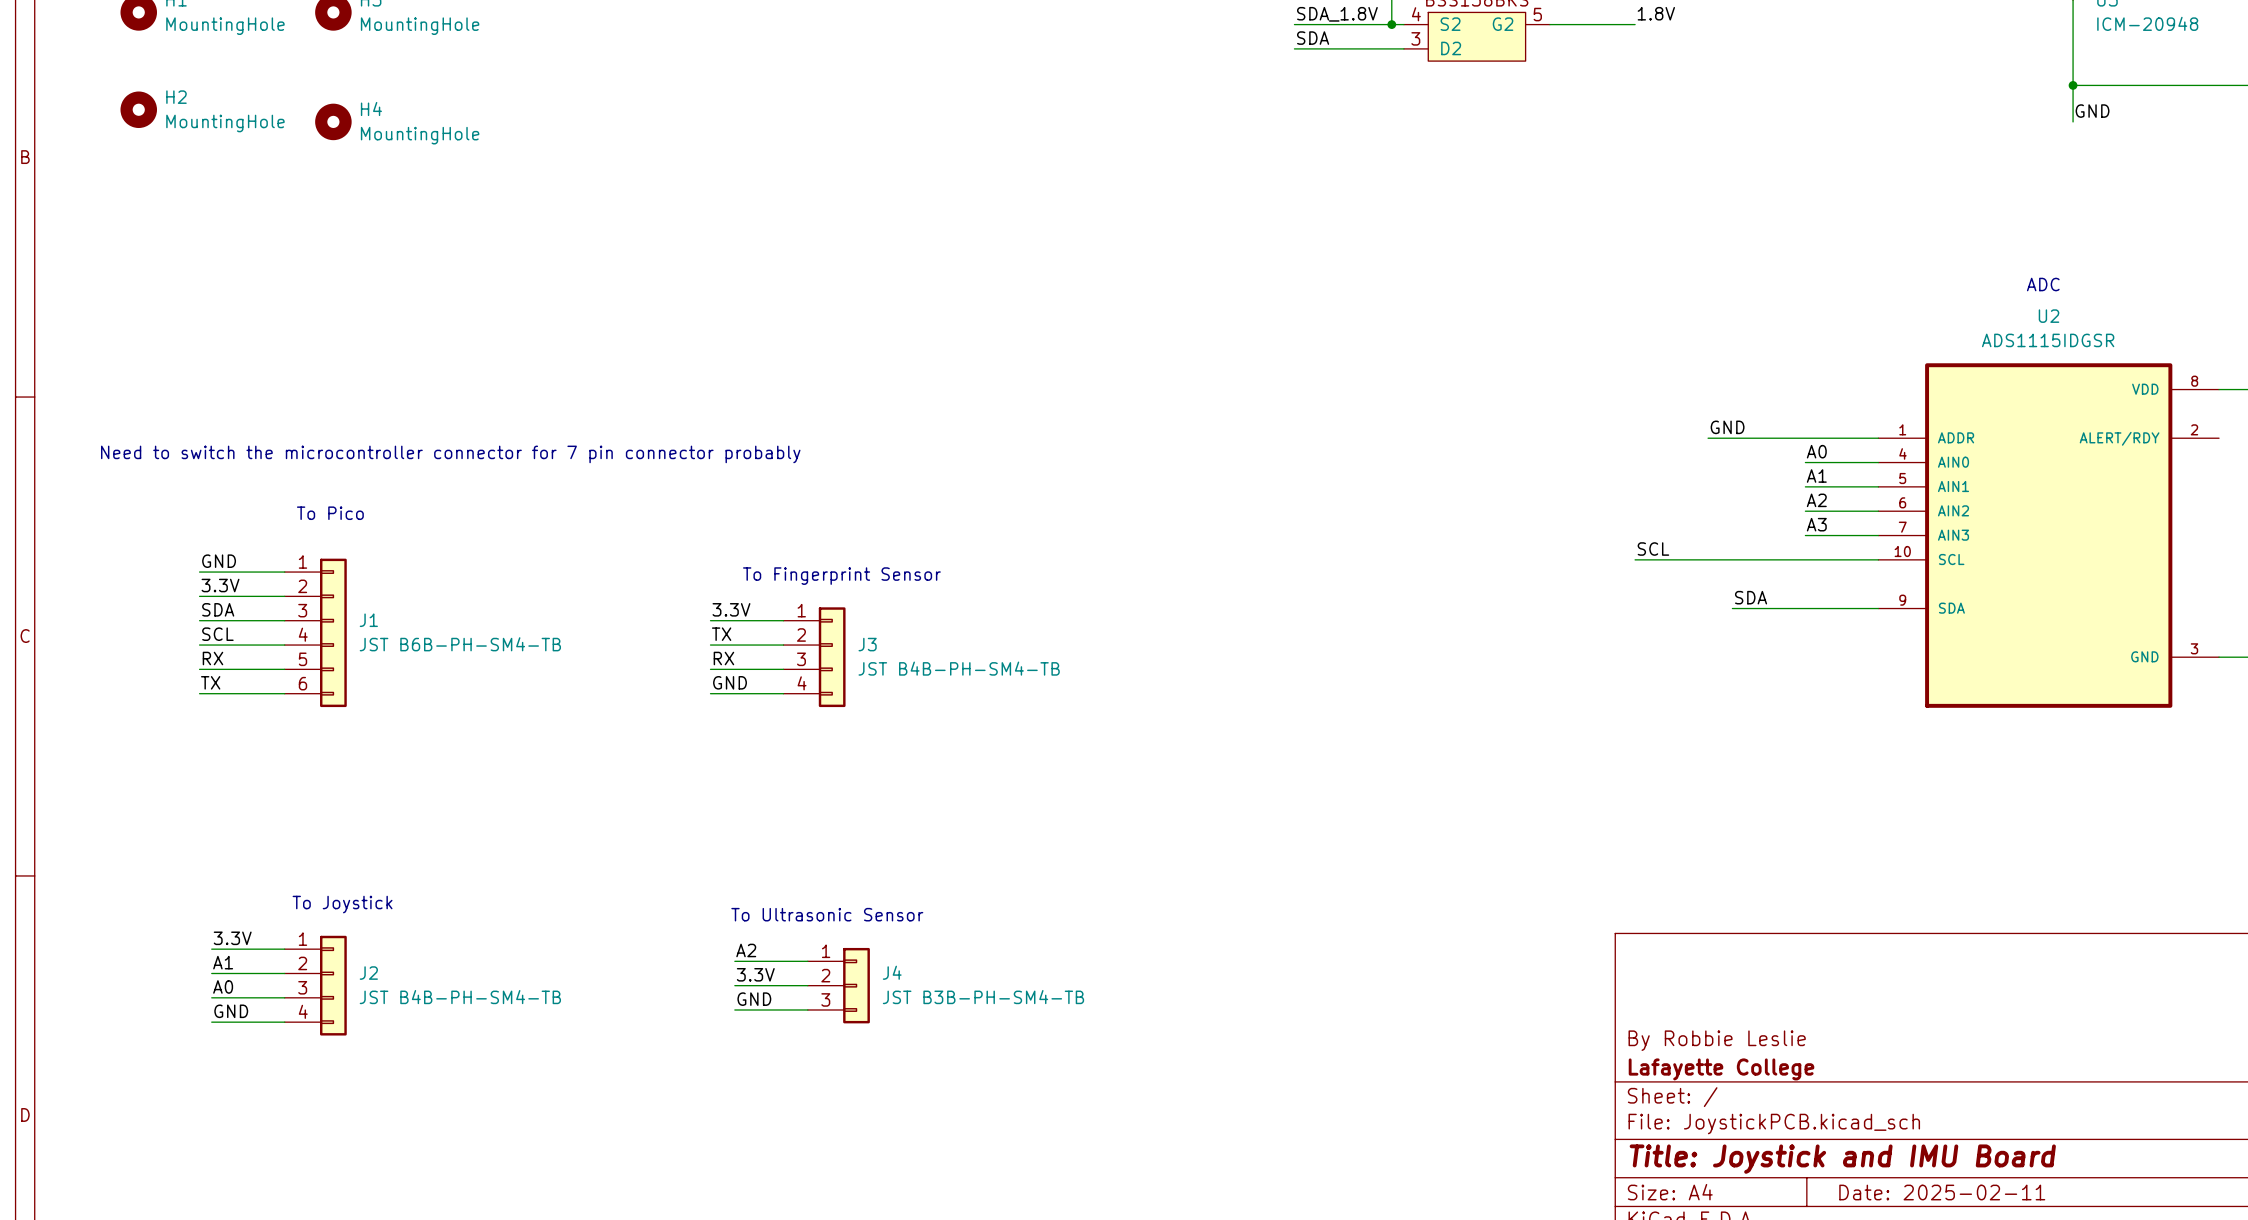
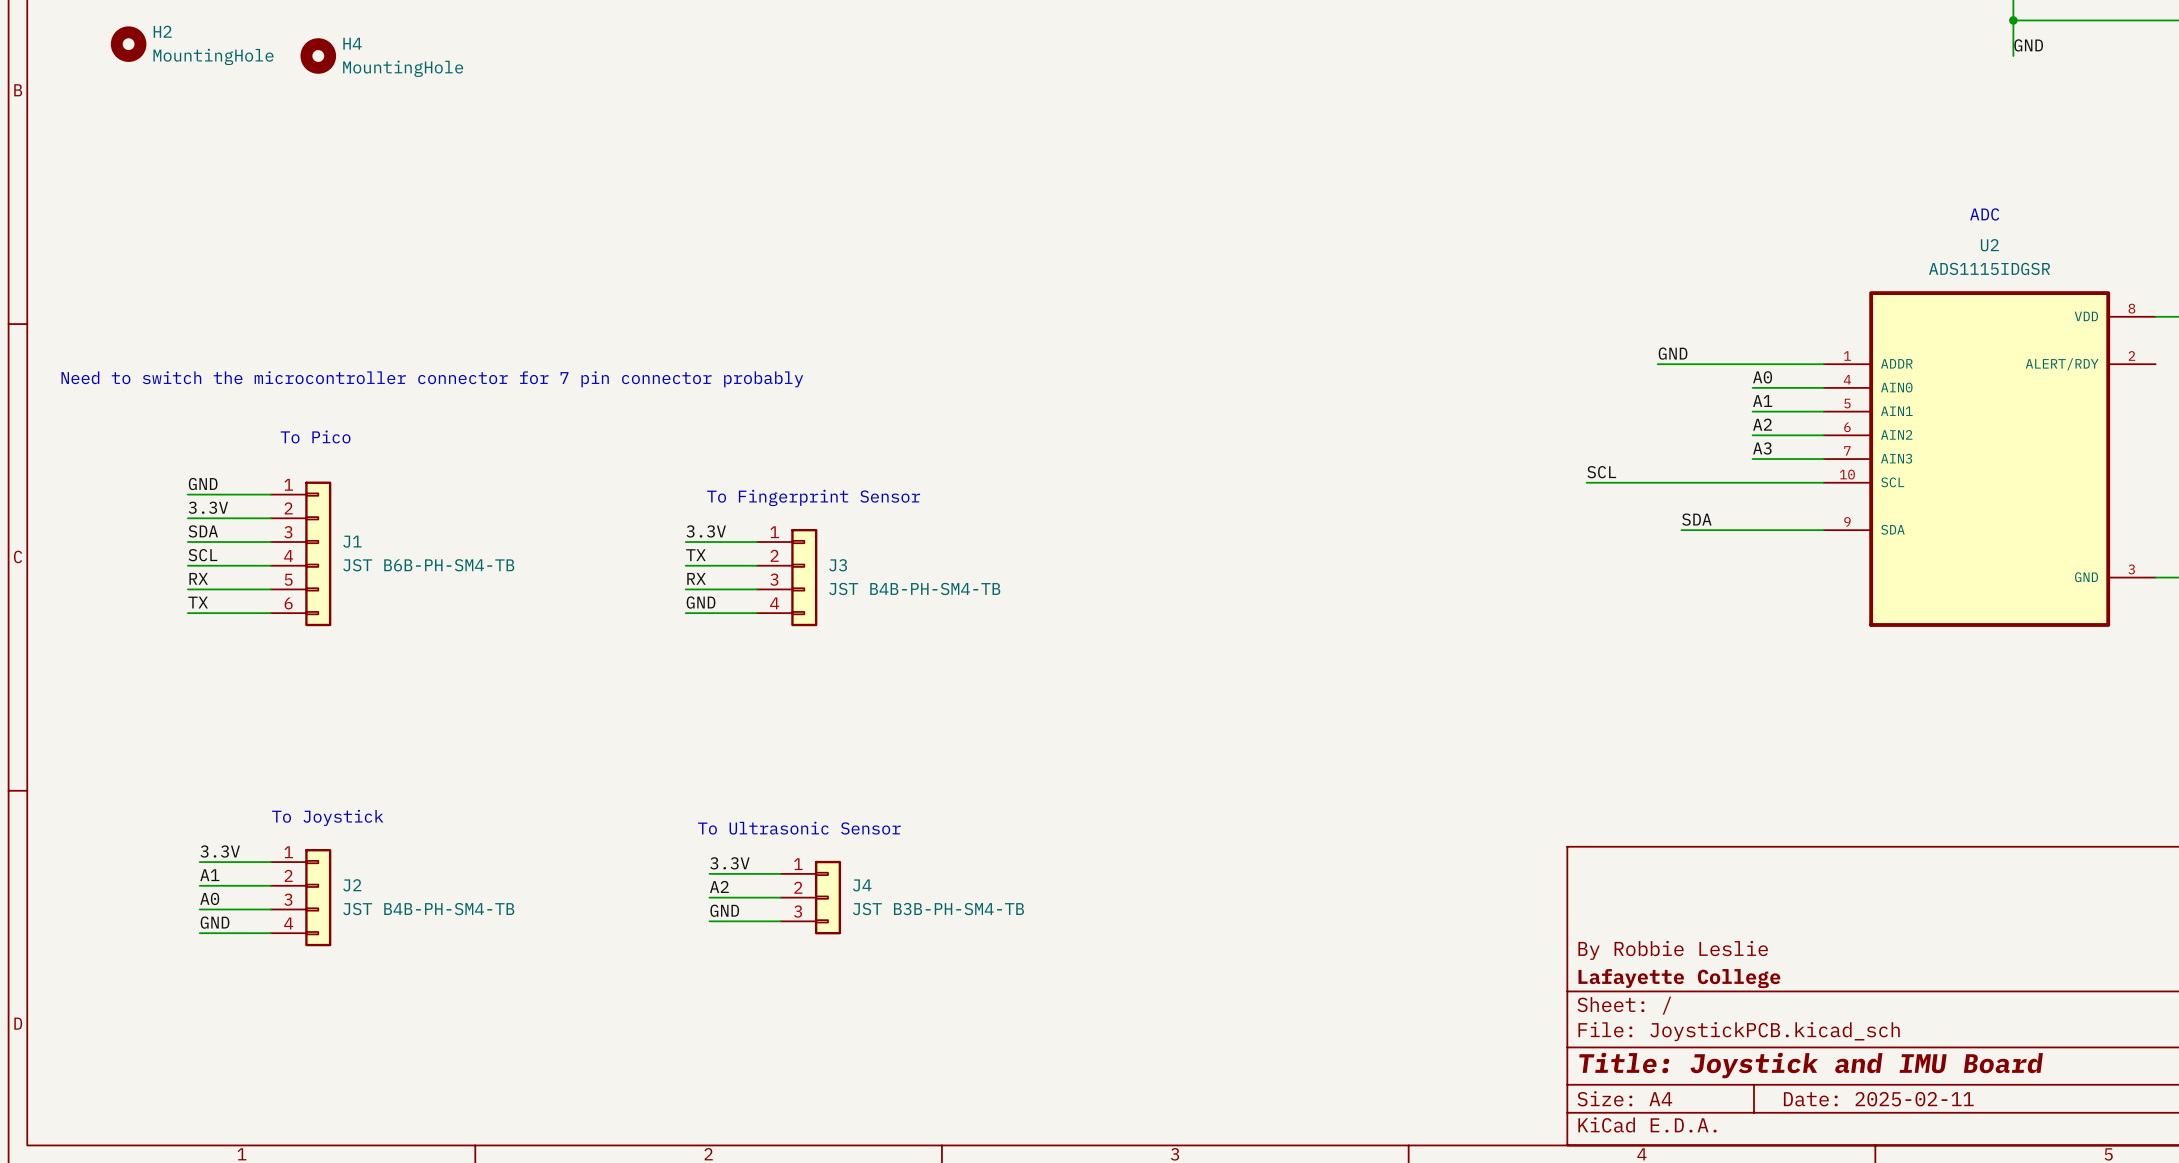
label: A2 (746, 950) -> 3.3V (729, 863)
label: 3.3V (755, 974) -> A2 (719, 886)

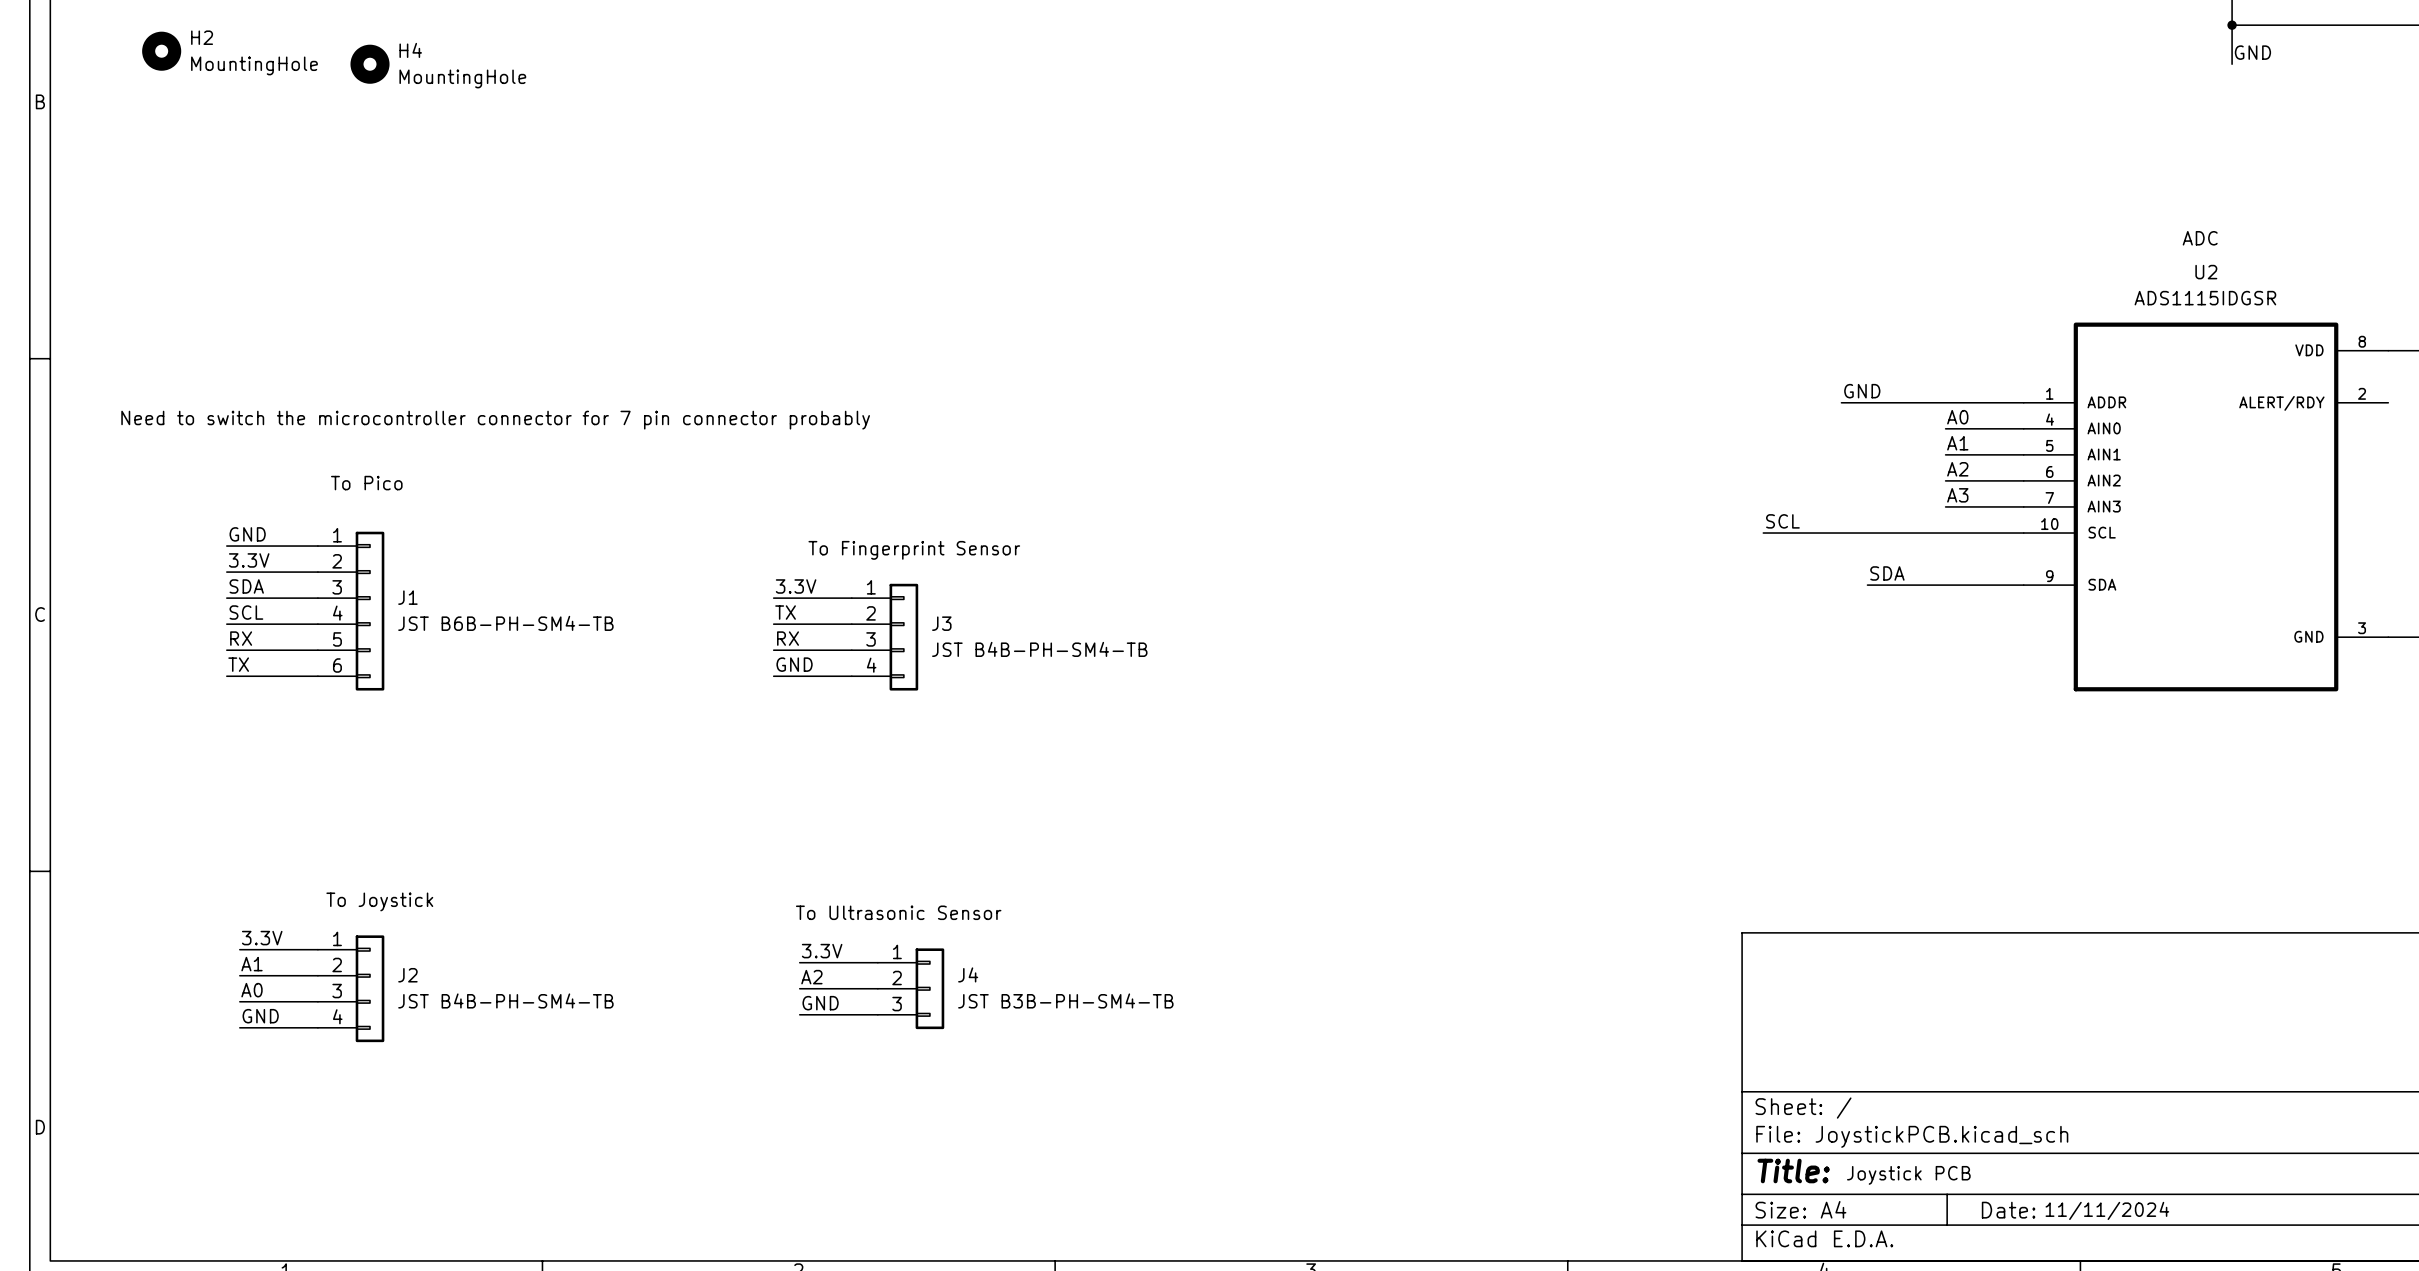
title block: By Robbie Leslie (1673, 950) -> none
title block: Lafayette College (1679, 978) -> none
title block: Title: Joystick and IMU Board (1811, 1065) -> Title: (1793, 1171)
text: none -> Joystick PCB (1908, 1175)
title block: Date: 2025-02-11 (1878, 1099) -> Date: (2008, 1210)
text: none -> 11/11/2024 (2107, 1210)

